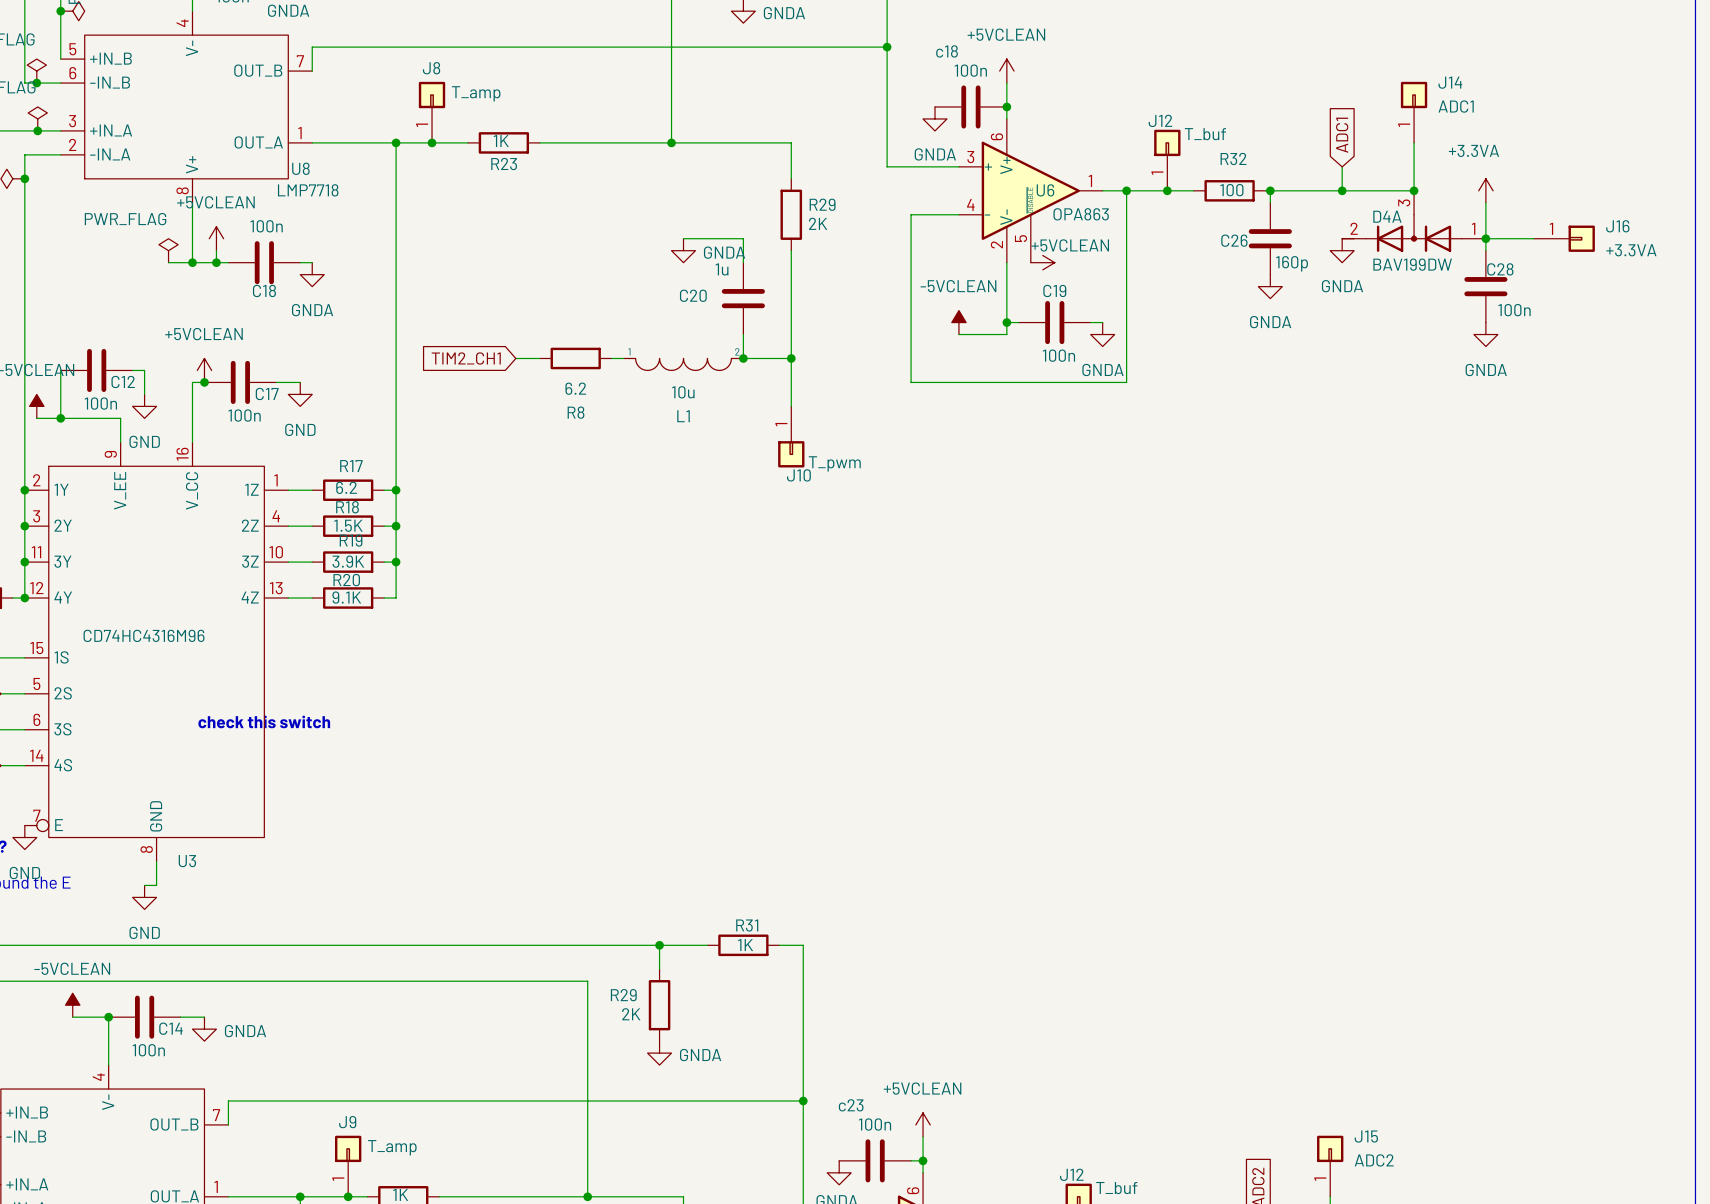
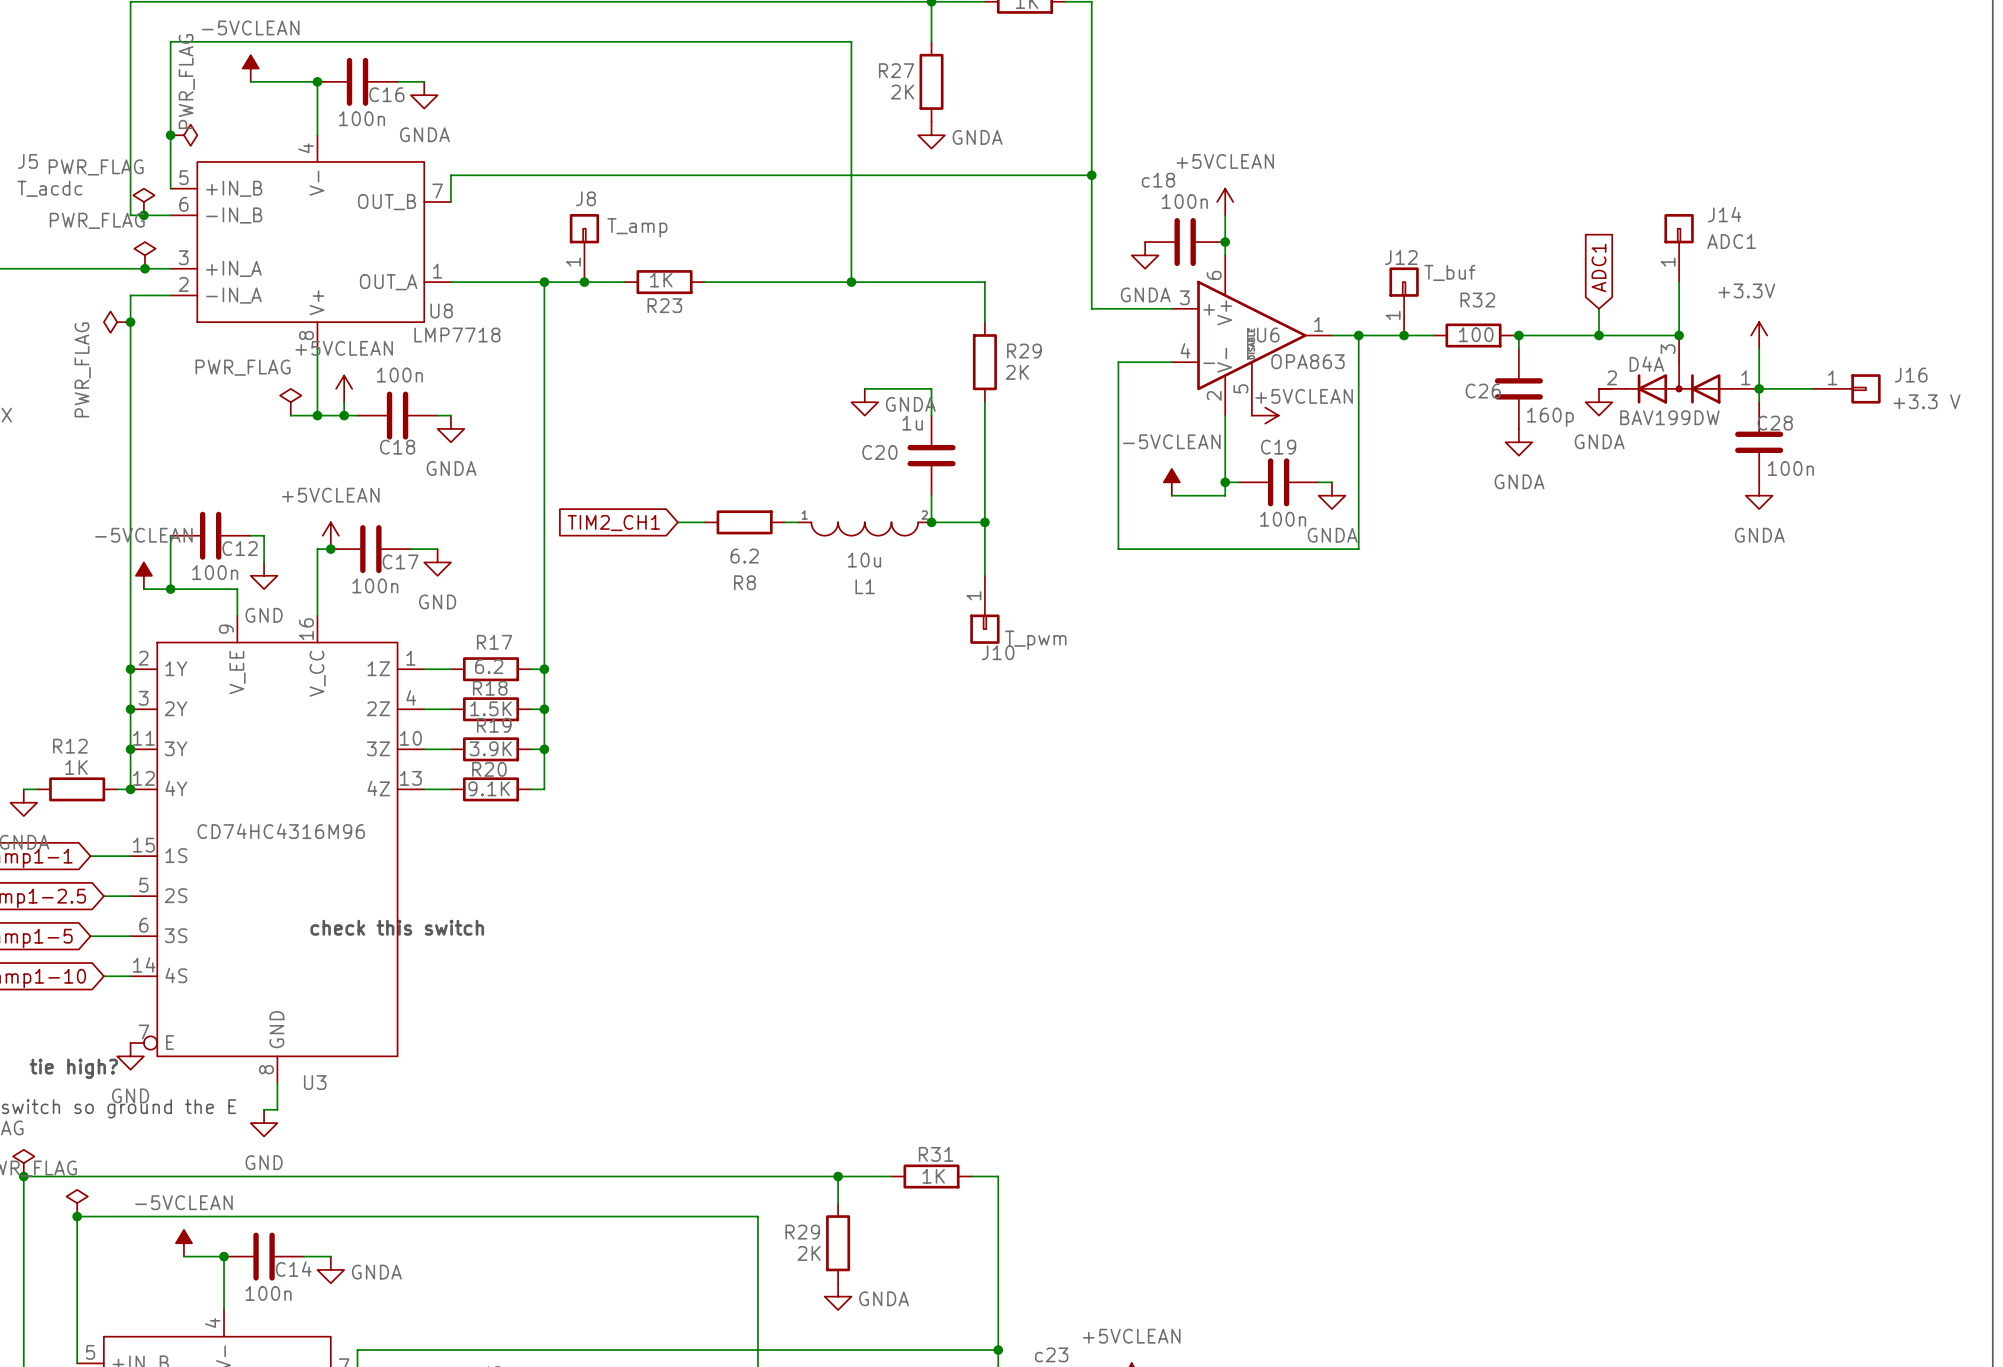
power symbol: +3.3VA (1485, 190) -> +3.3V (1759, 335)
J16 value: +3.3VA (1631, 250) -> +3.3 V (1926, 401)

